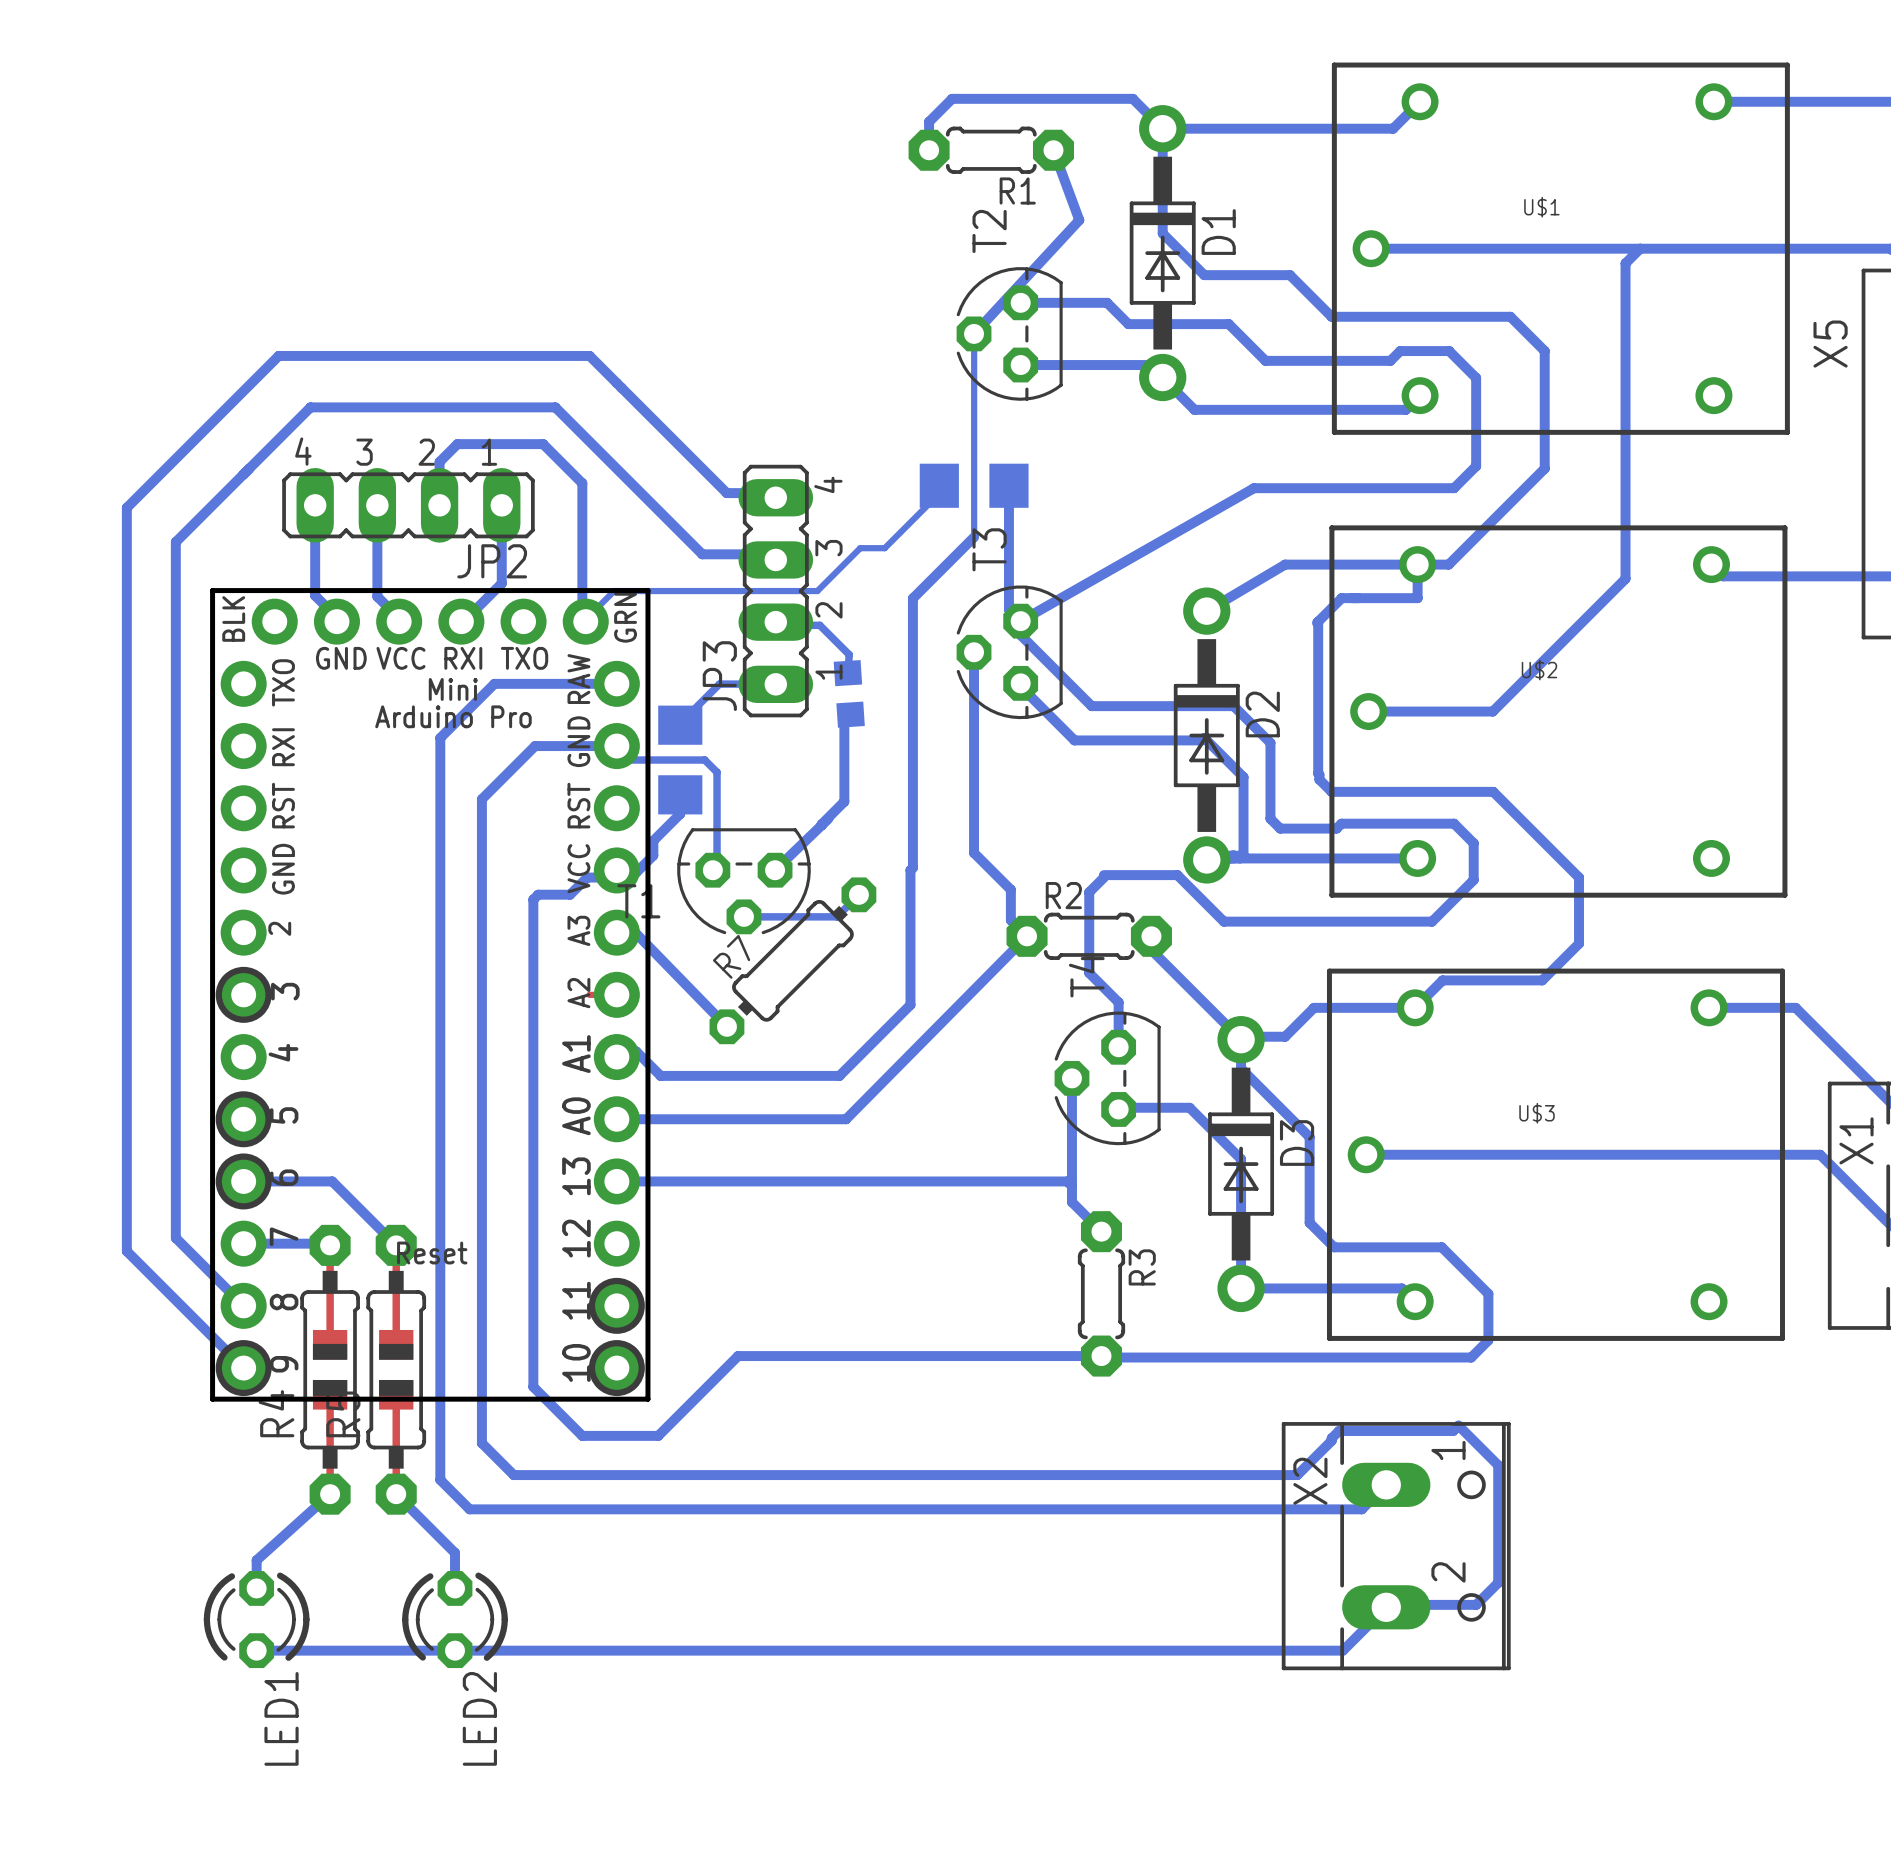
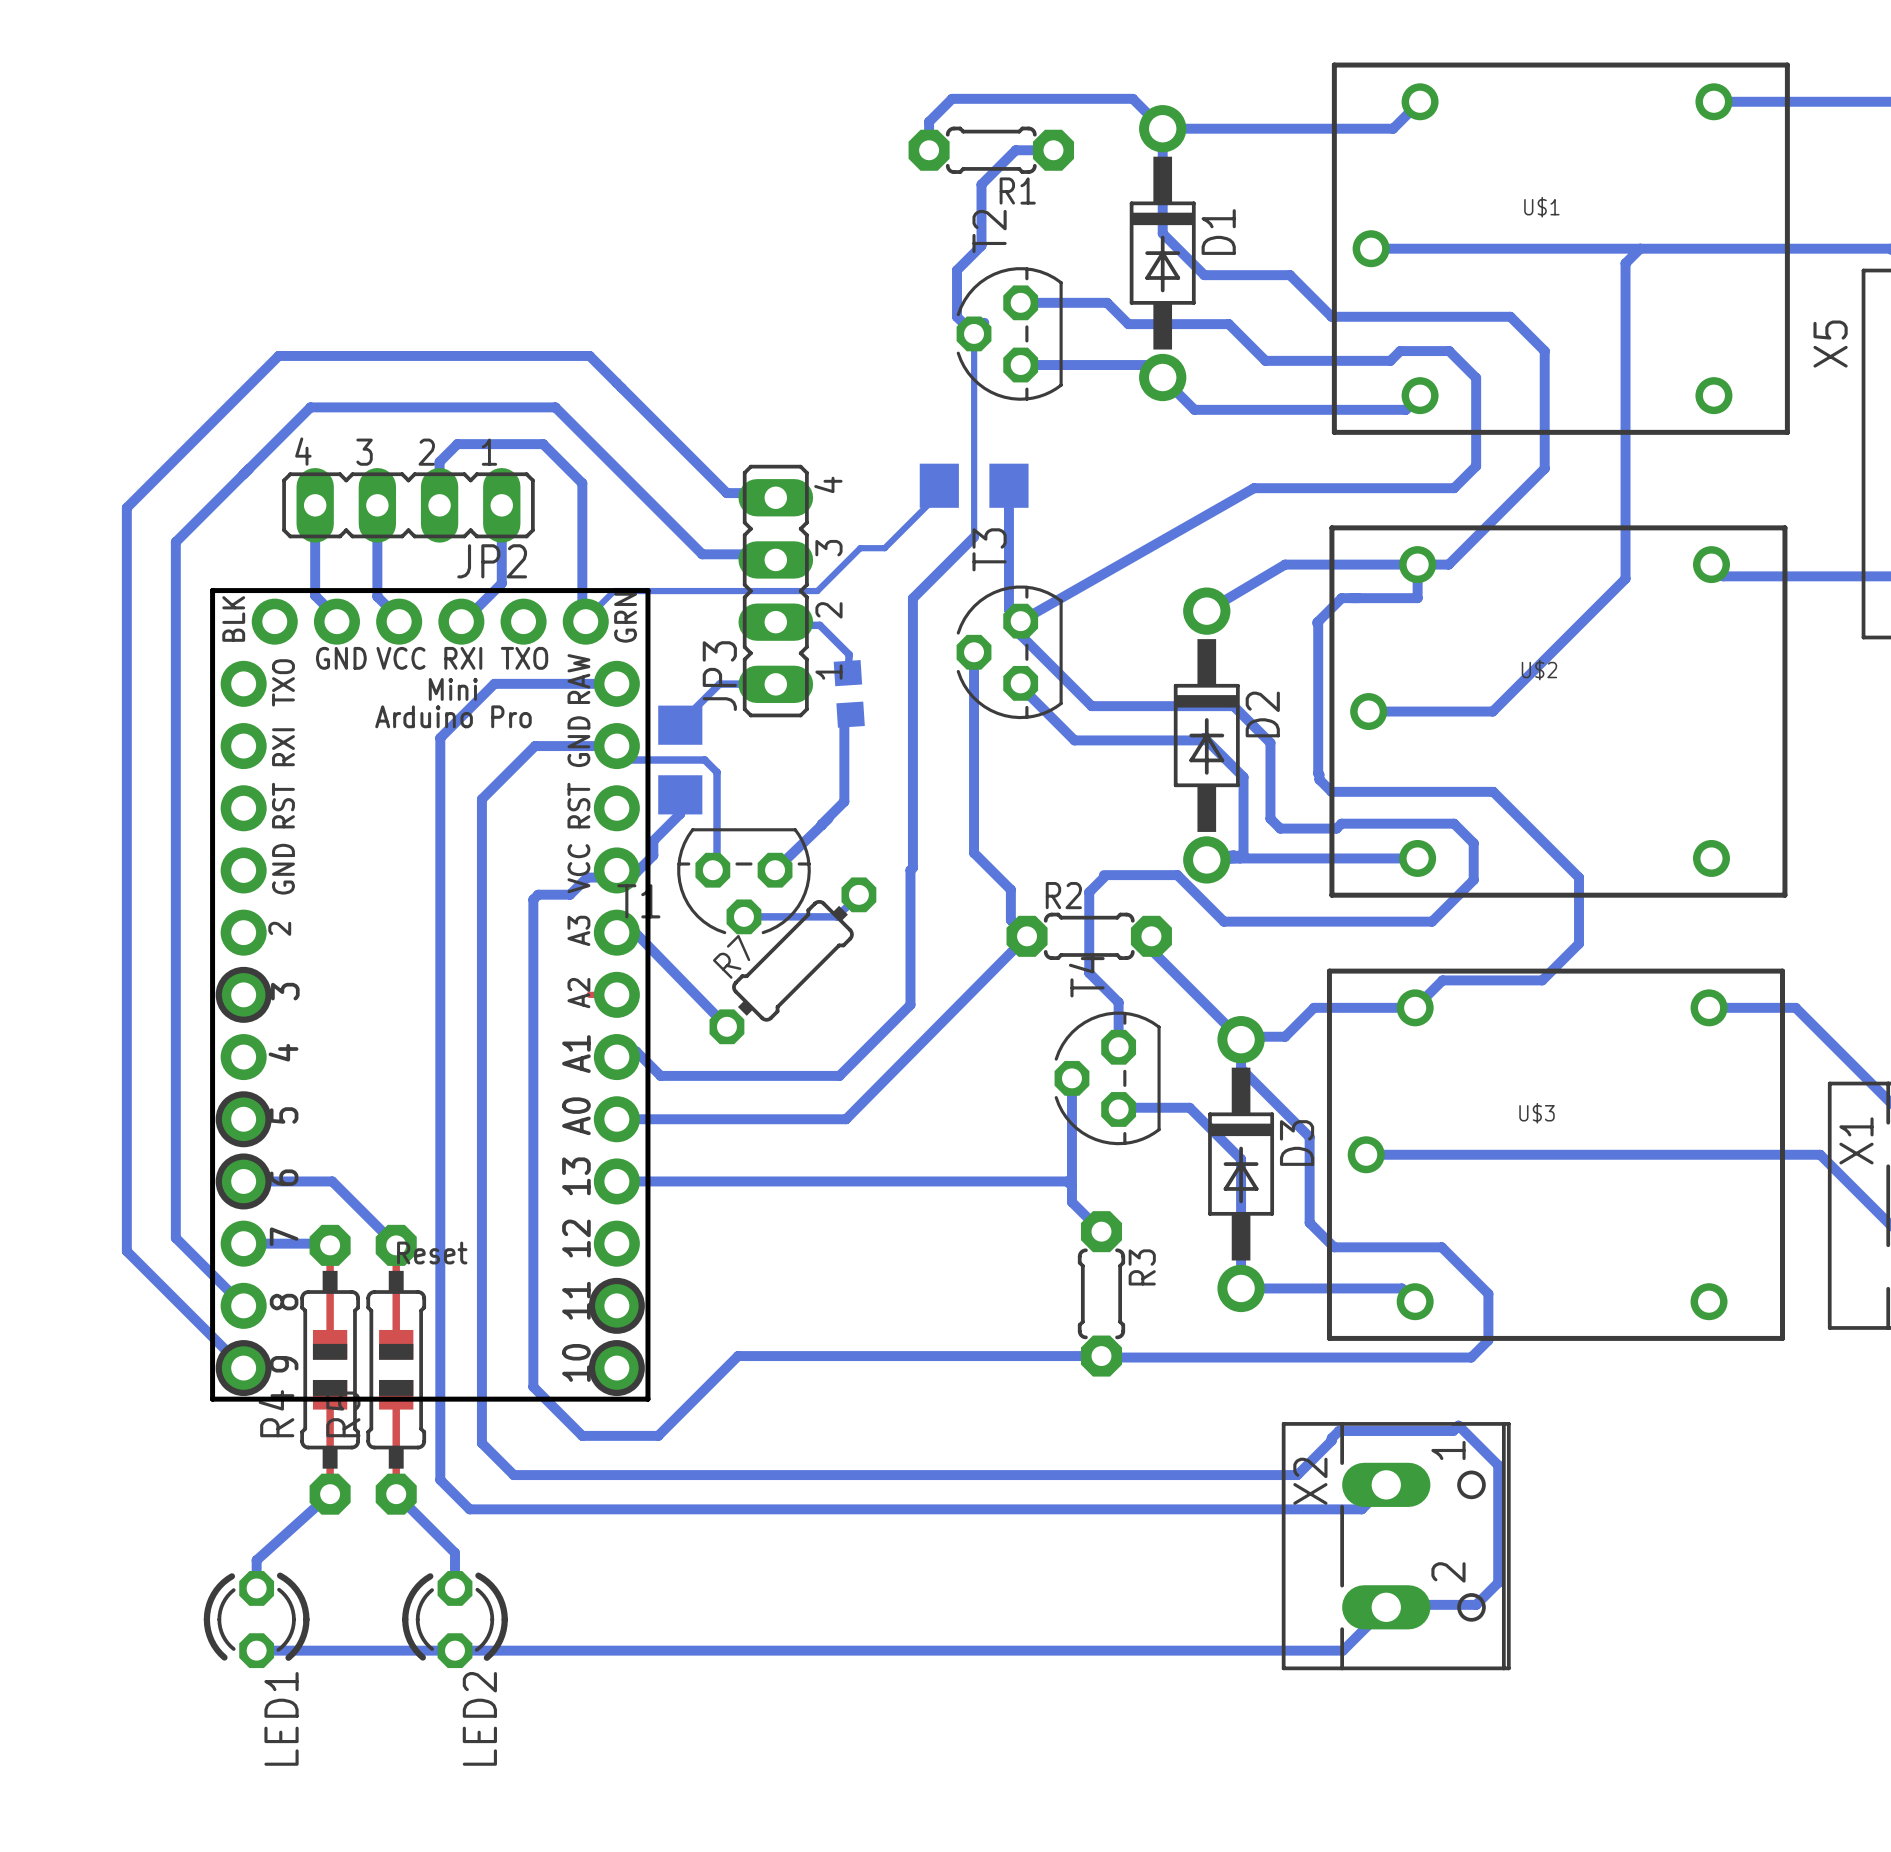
bottom track: (1053, 150) (1079, 220) (984, 322) -> (1053, 150) (1015, 150) (981, 184) (981, 245) (957, 270) (957, 316) (974, 333)

